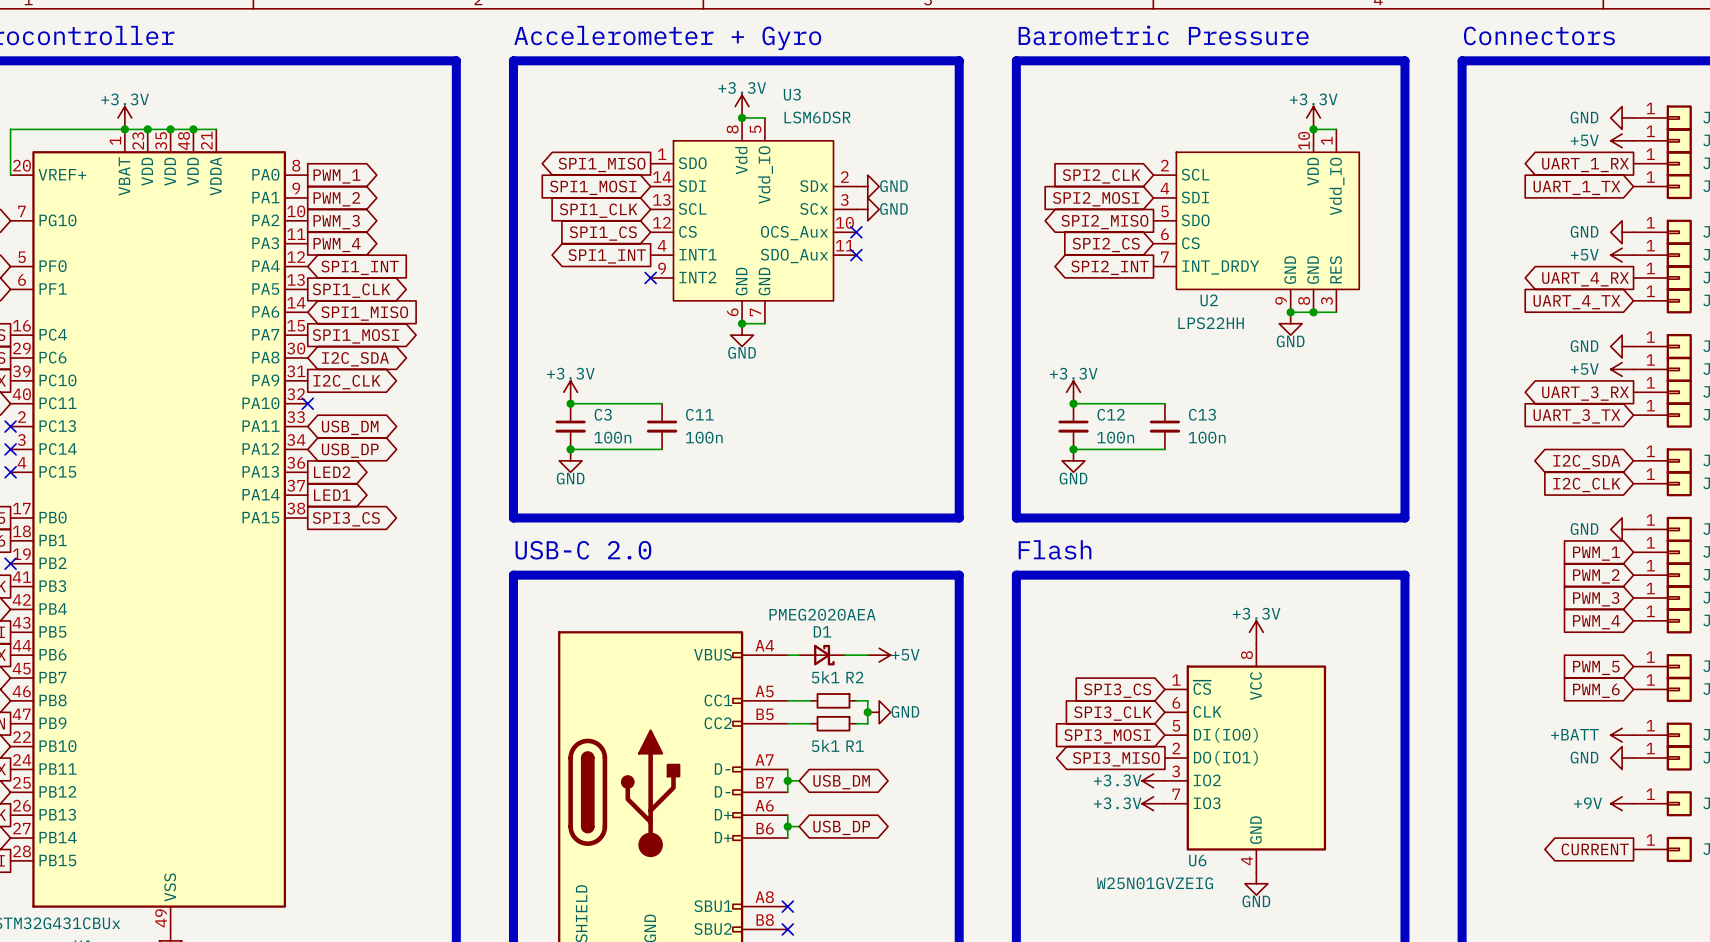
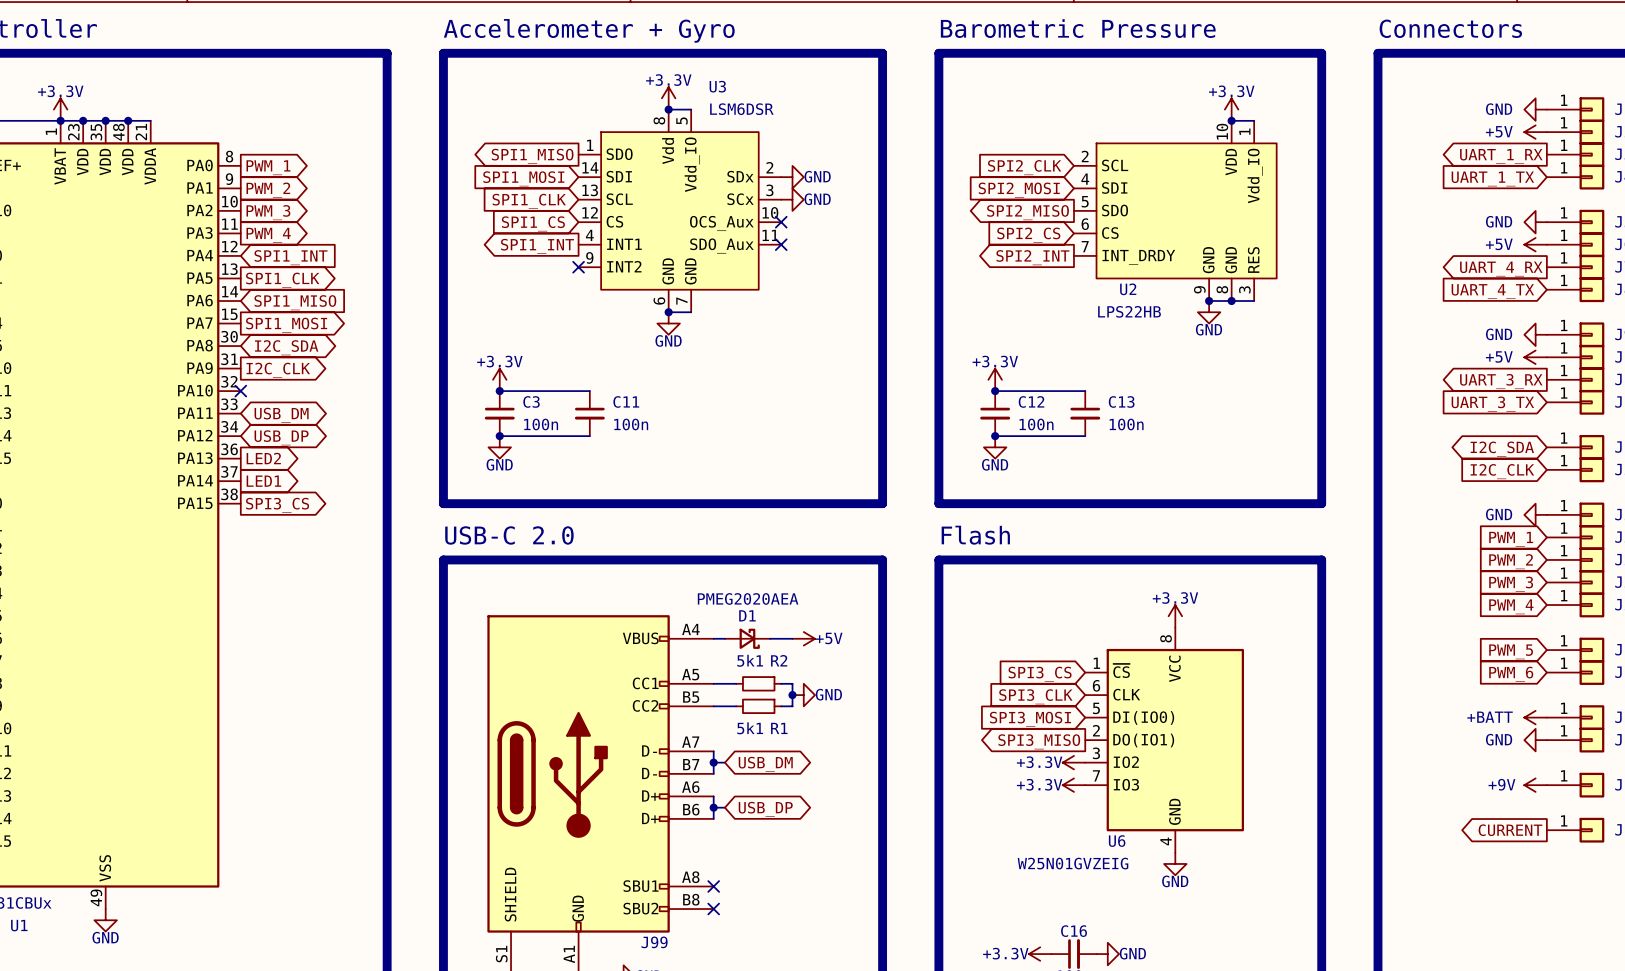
U2 value: LPS22HH (1211, 323) -> LPS22HB (1129, 311)

